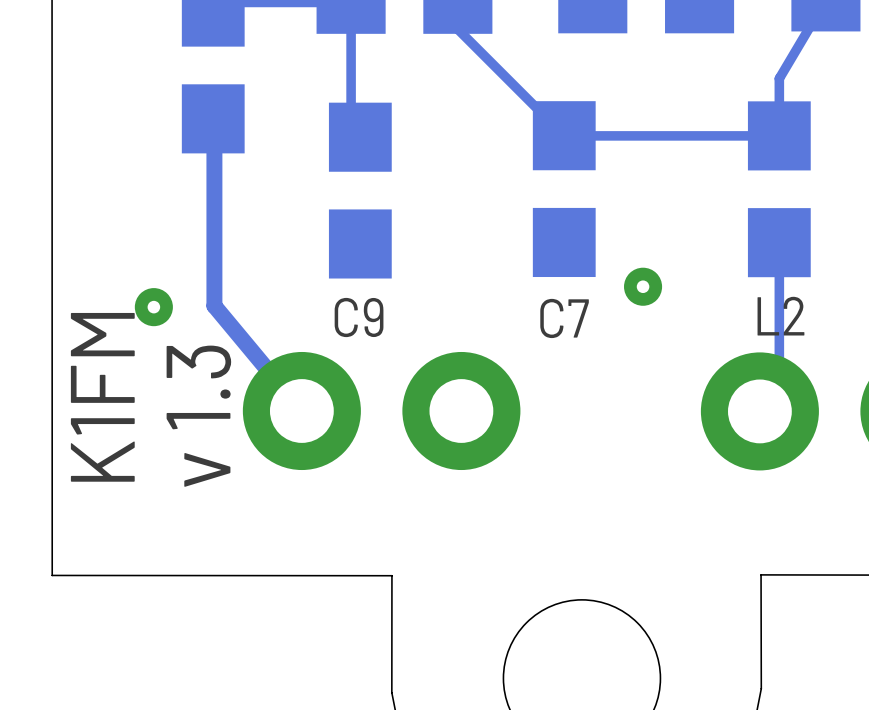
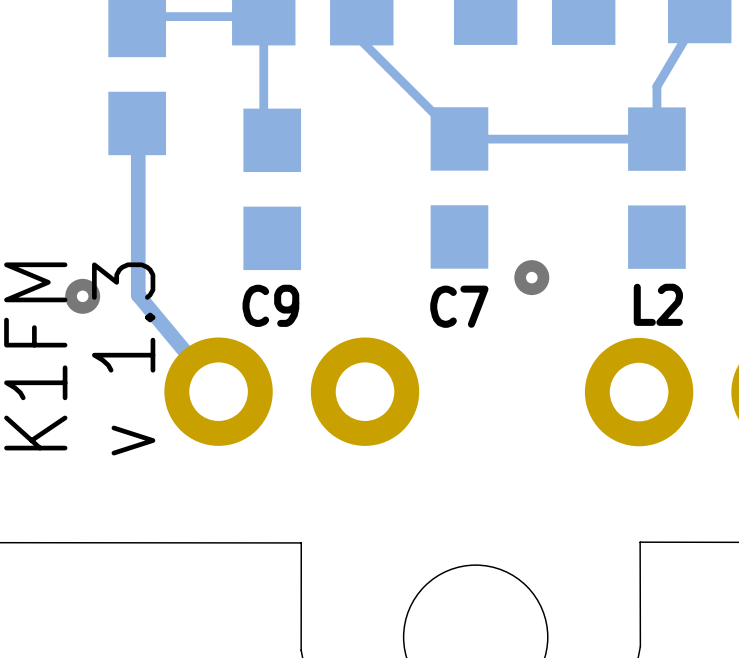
track: (779, 242) (779, 391) (759, 411) -> none

